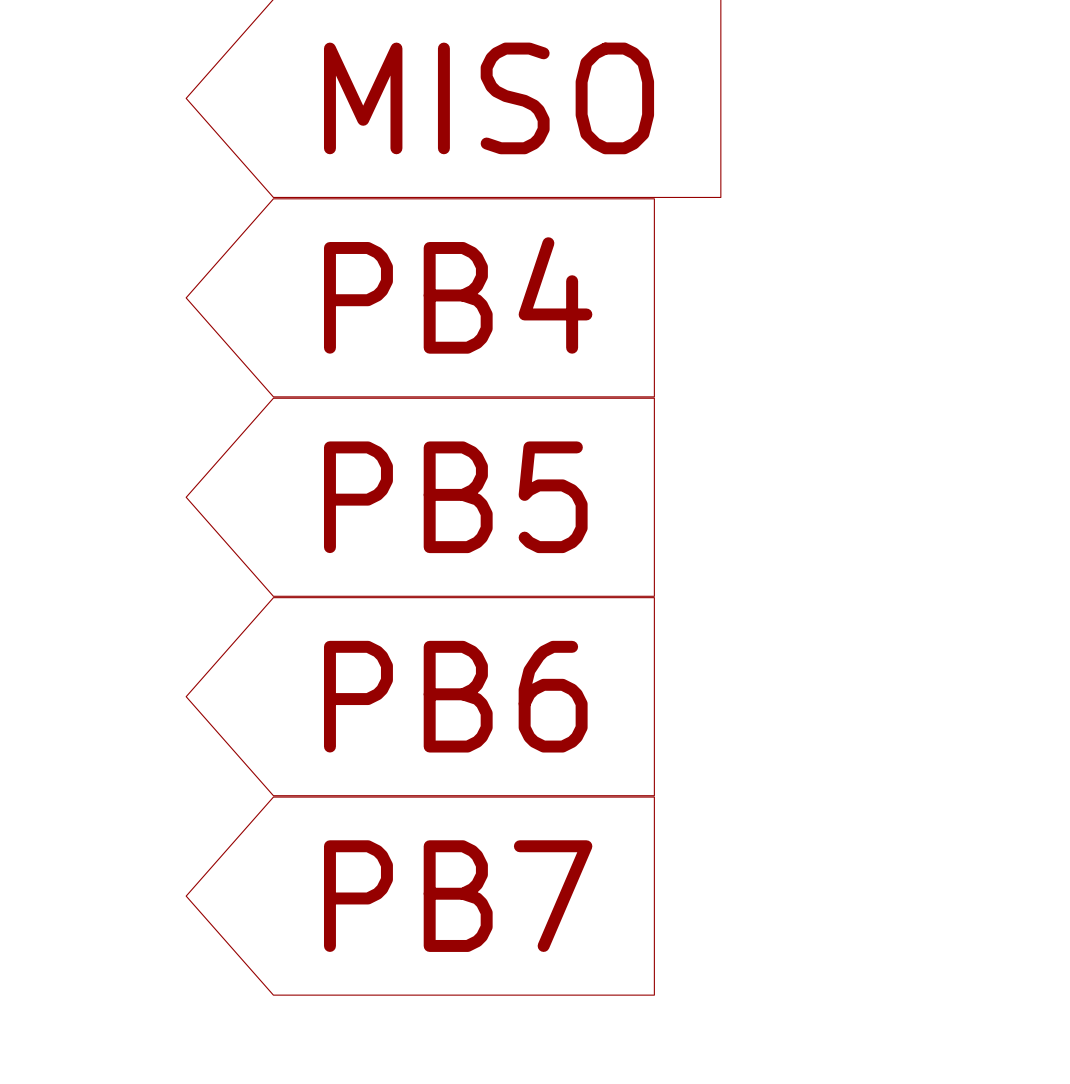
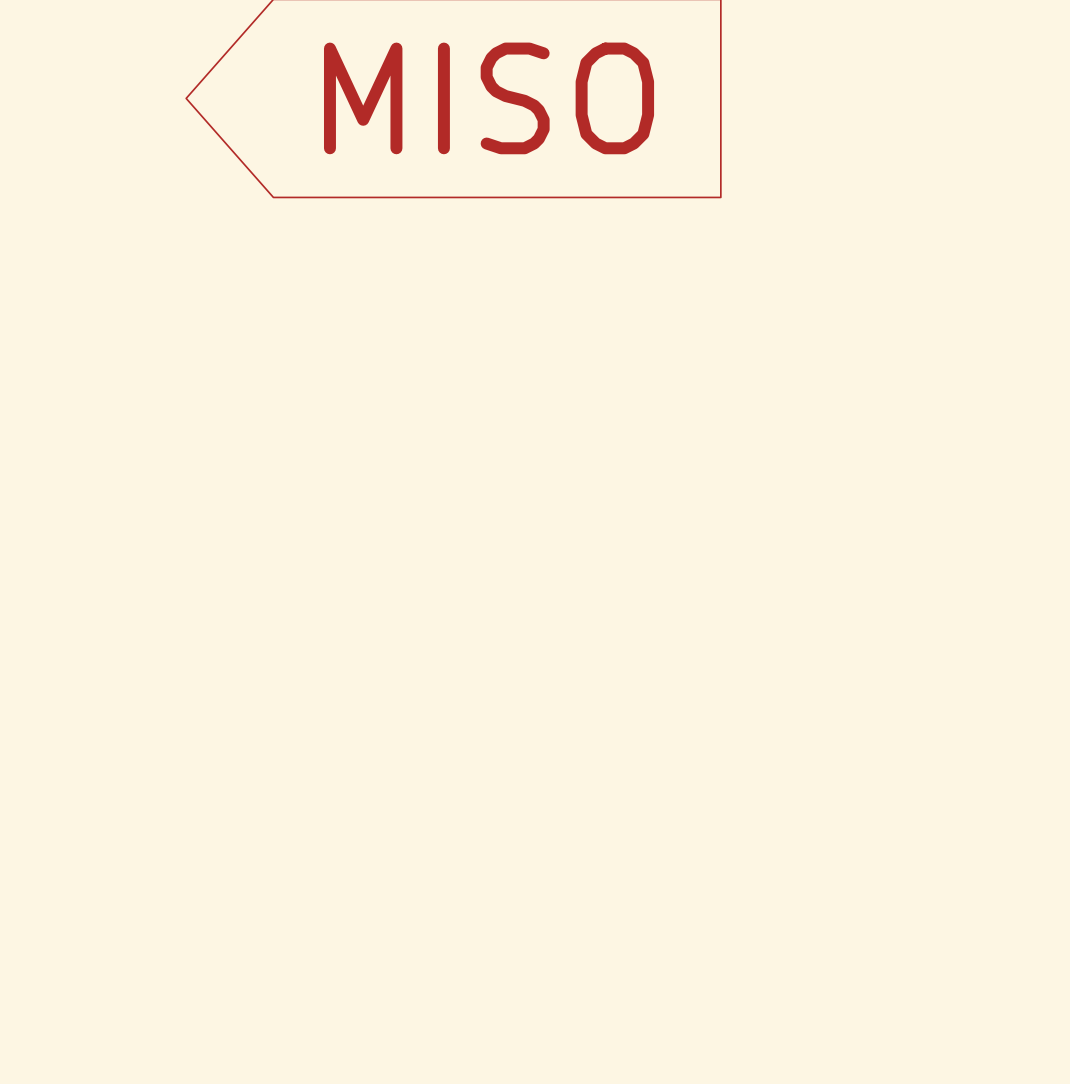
global label: PB4 (458, 295) -> none
global label: PB5 (455, 497) -> none
global label: PB6 (455, 696) -> none
global label: PB7 (458, 896) -> none

